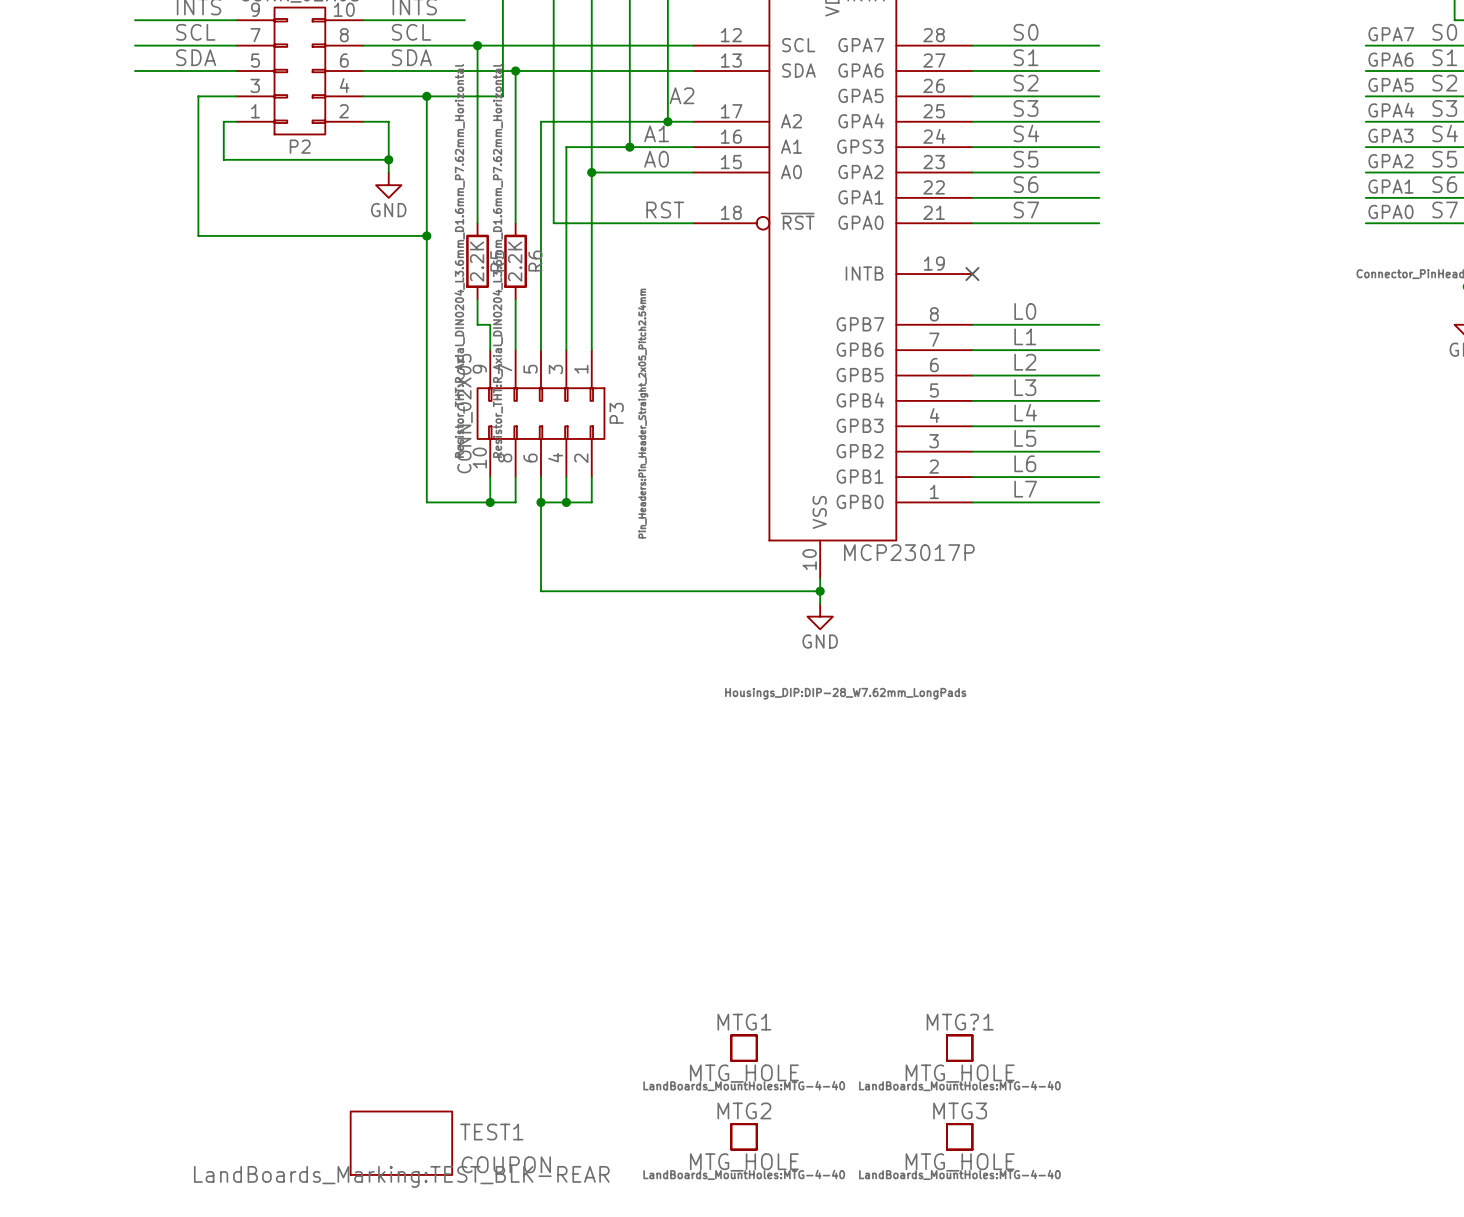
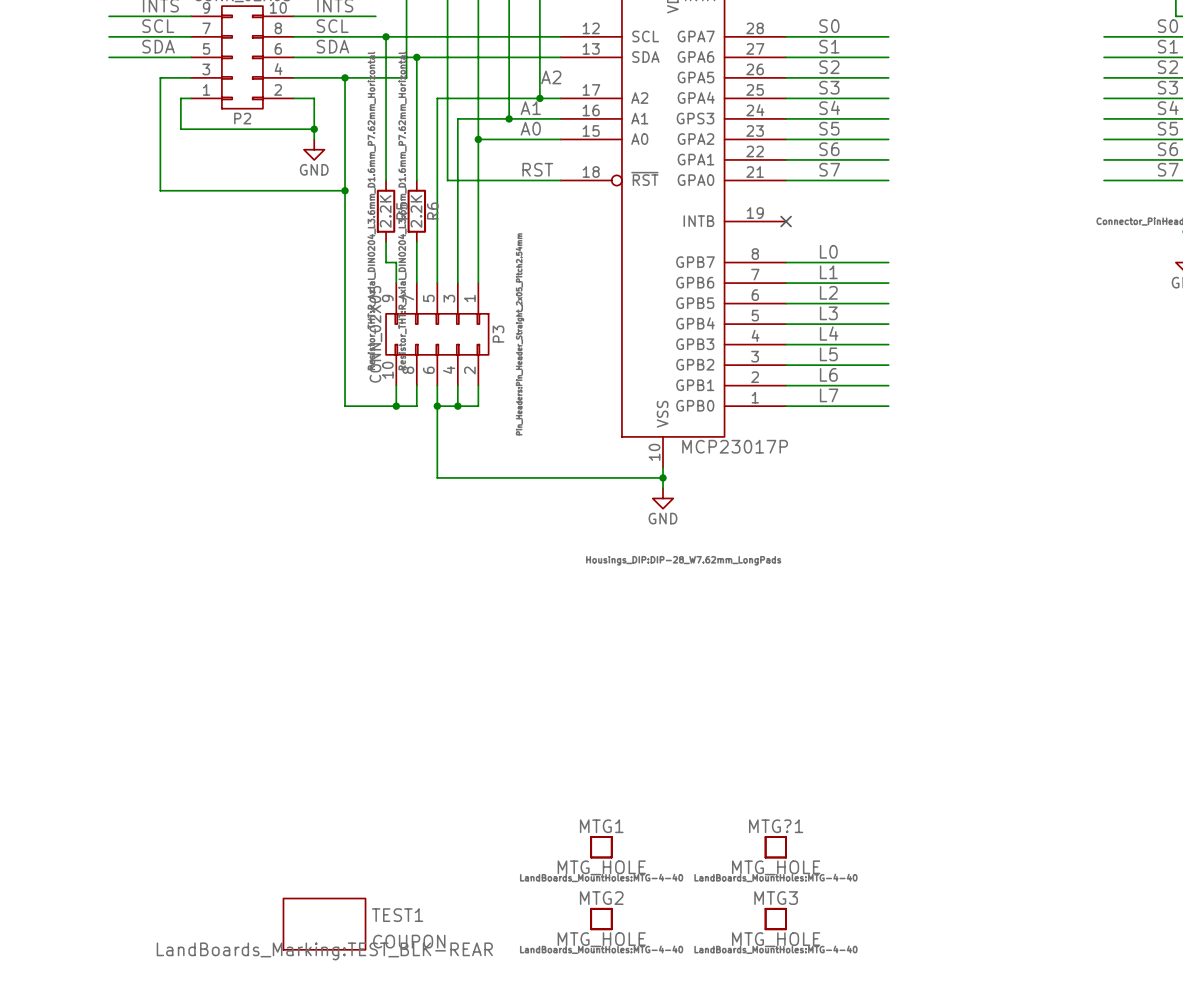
label: GPA7 (1391, 34) -> none
label: GPA6 (1390, 59) -> none
label: GPA5 (1390, 85) -> none
label: GPA4 (1391, 110) -> none
label: GPA3 (1390, 135) -> none
label: GPA2 (1390, 161) -> none
label: GPA1 (1390, 186) -> none
label: GPA0 (1390, 211) -> none

